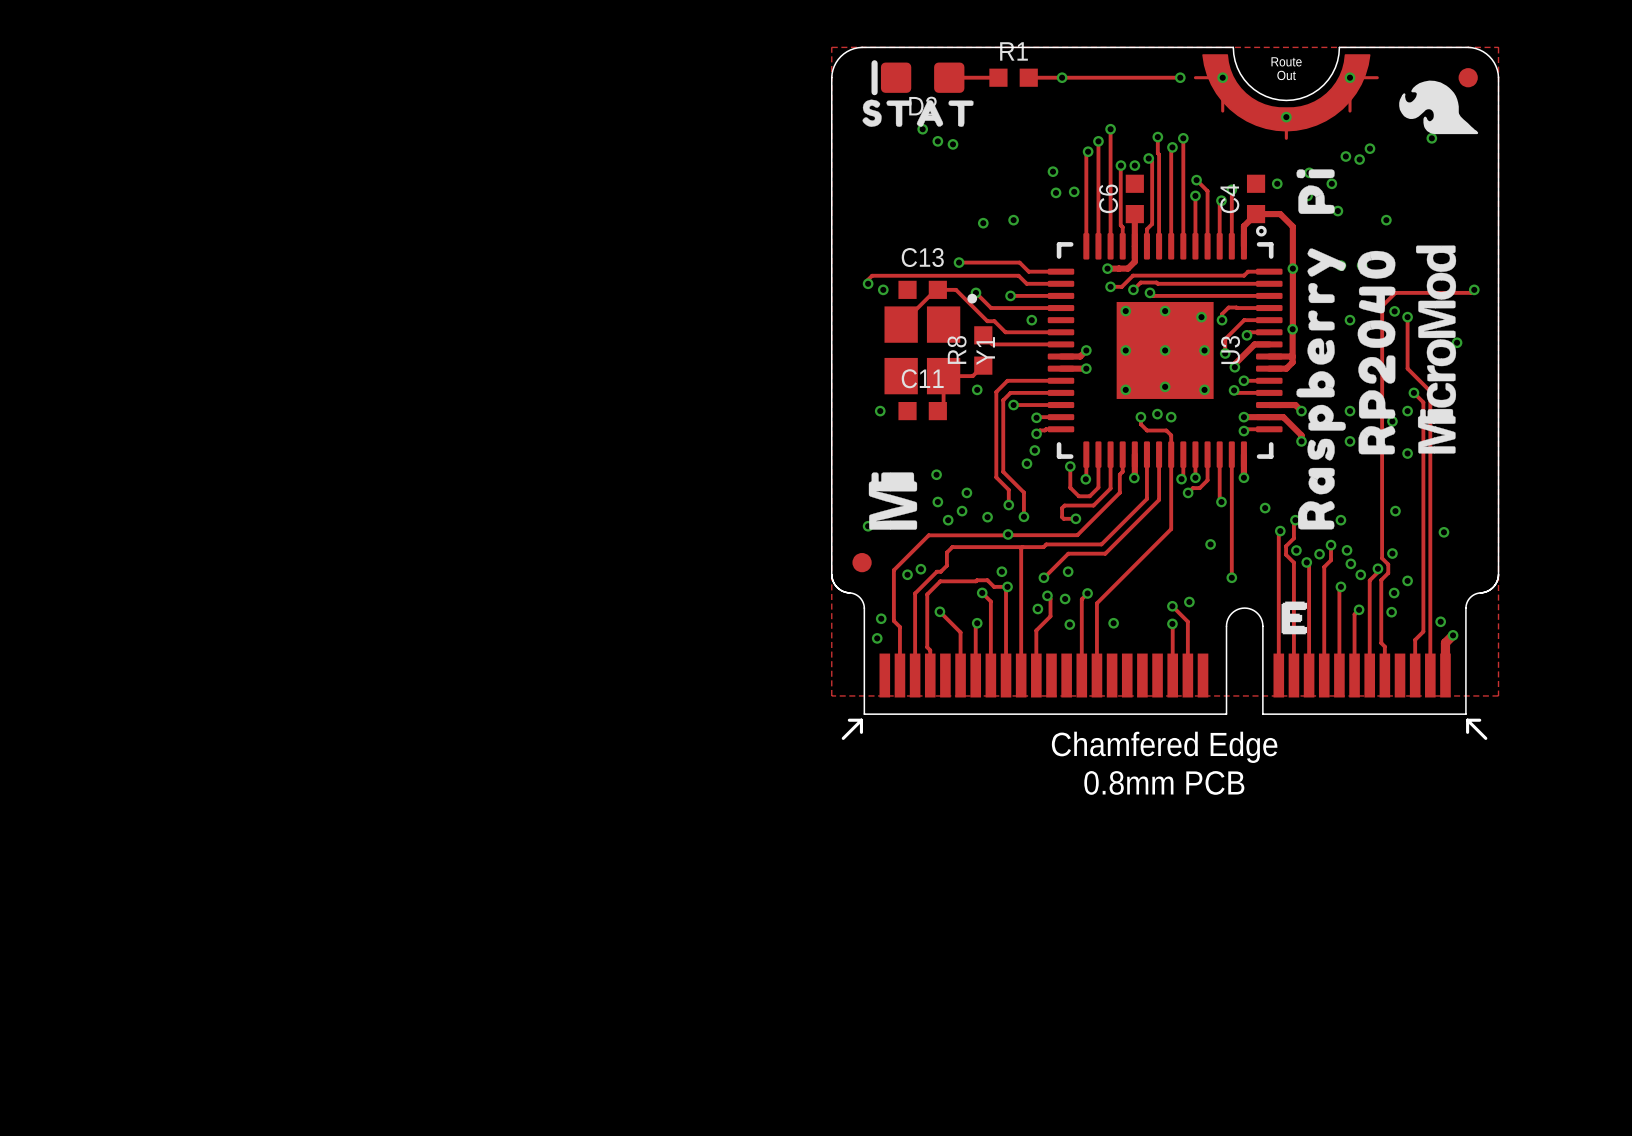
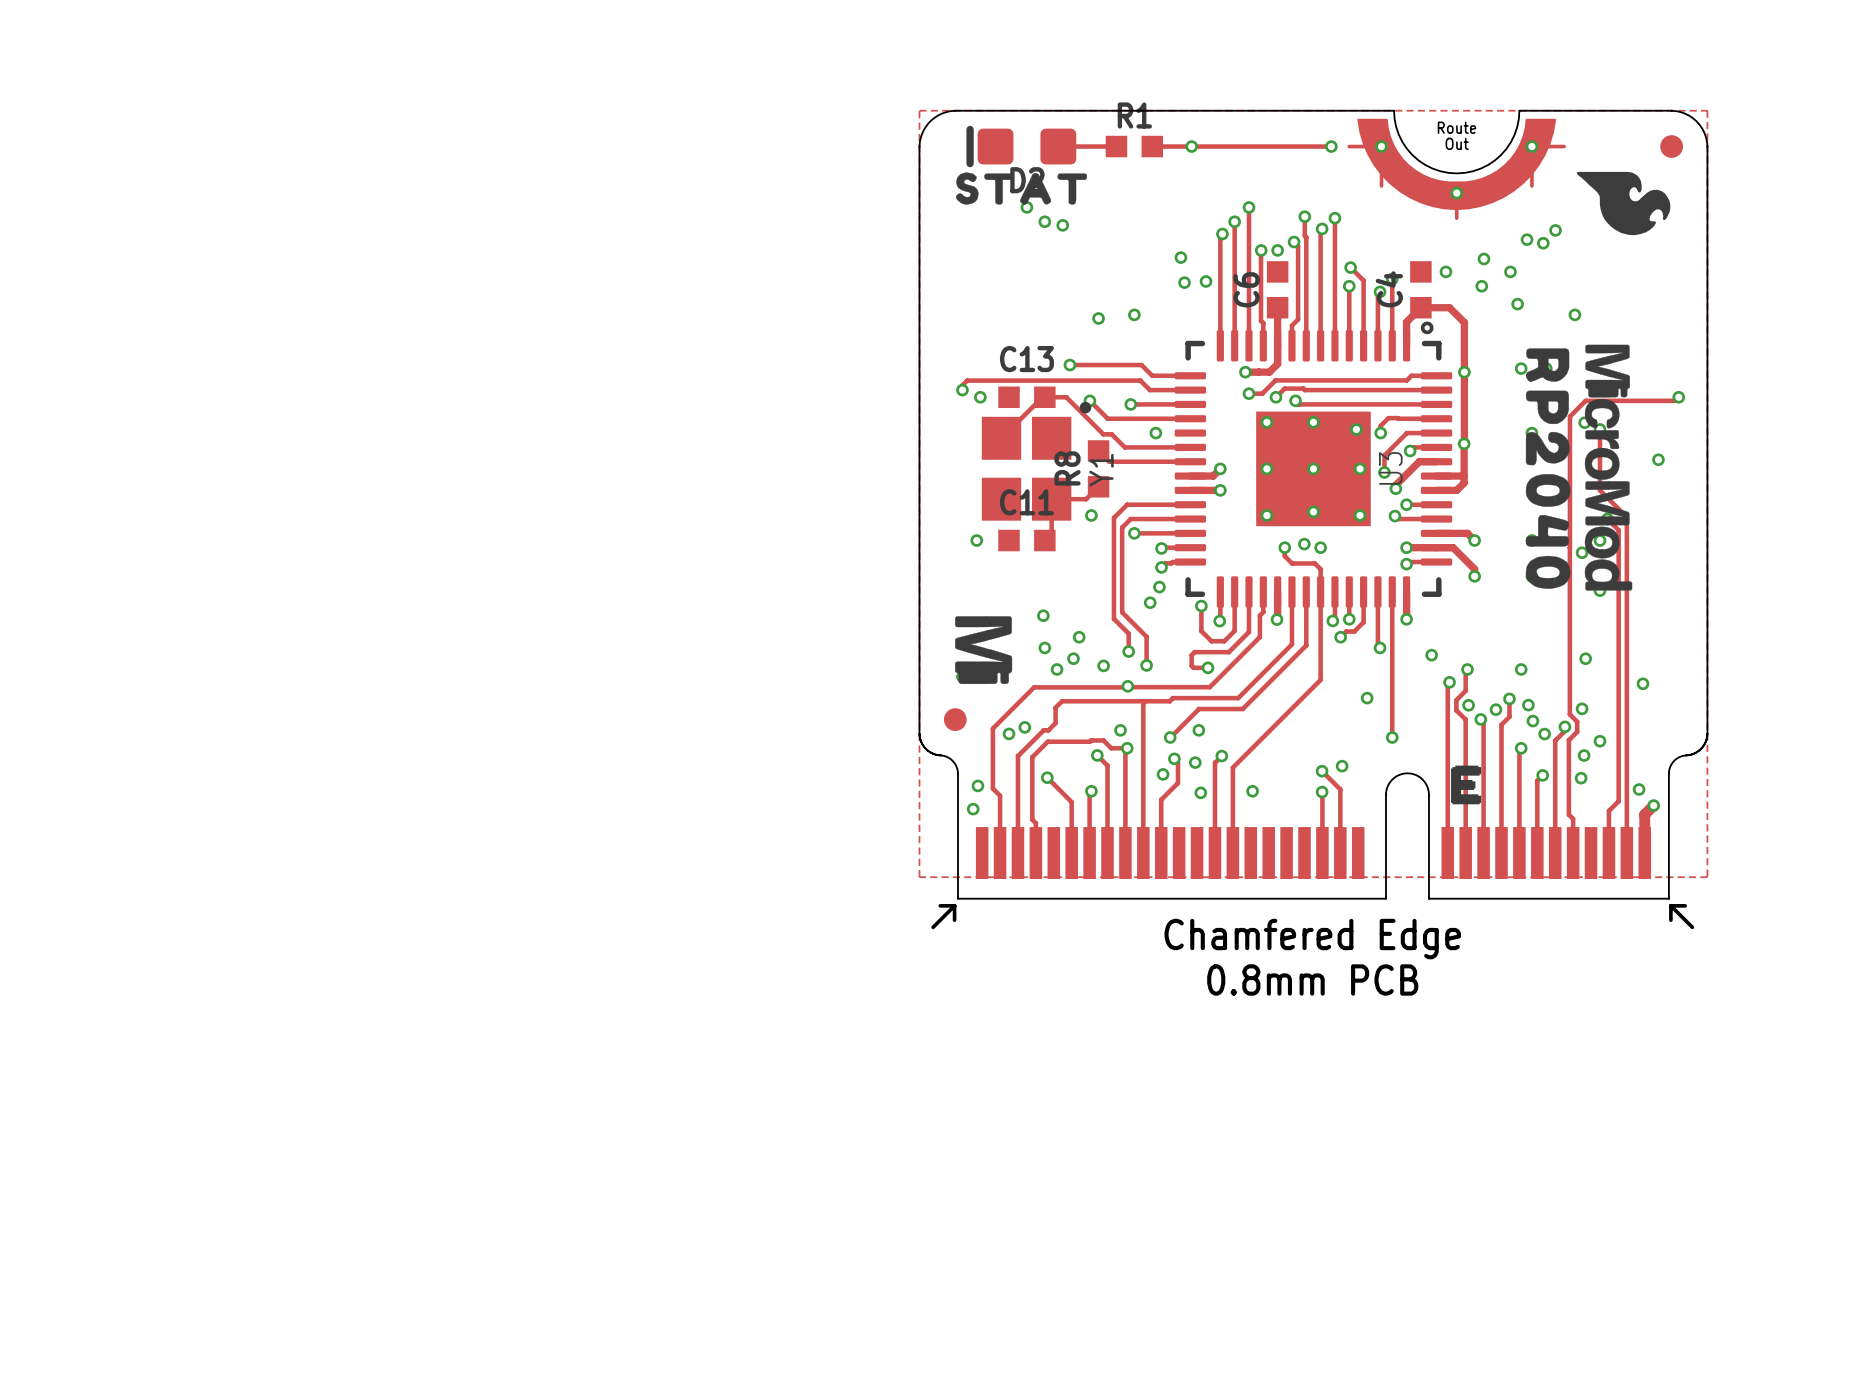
drawing shape: [1399, 80, 1479, 135] -> [1576, 171, 1671, 236]
drawing: [1296, 169, 1346, 530] -> none
drawing: none -> [1584, 344, 1633, 591]
drawing: [1415, 245, 1457, 454] -> none
drawing shape: [1357, 250, 1396, 455] -> [1525, 348, 1571, 589]
drawing shape: [868, 472, 918, 530] -> [955, 616, 1013, 685]

